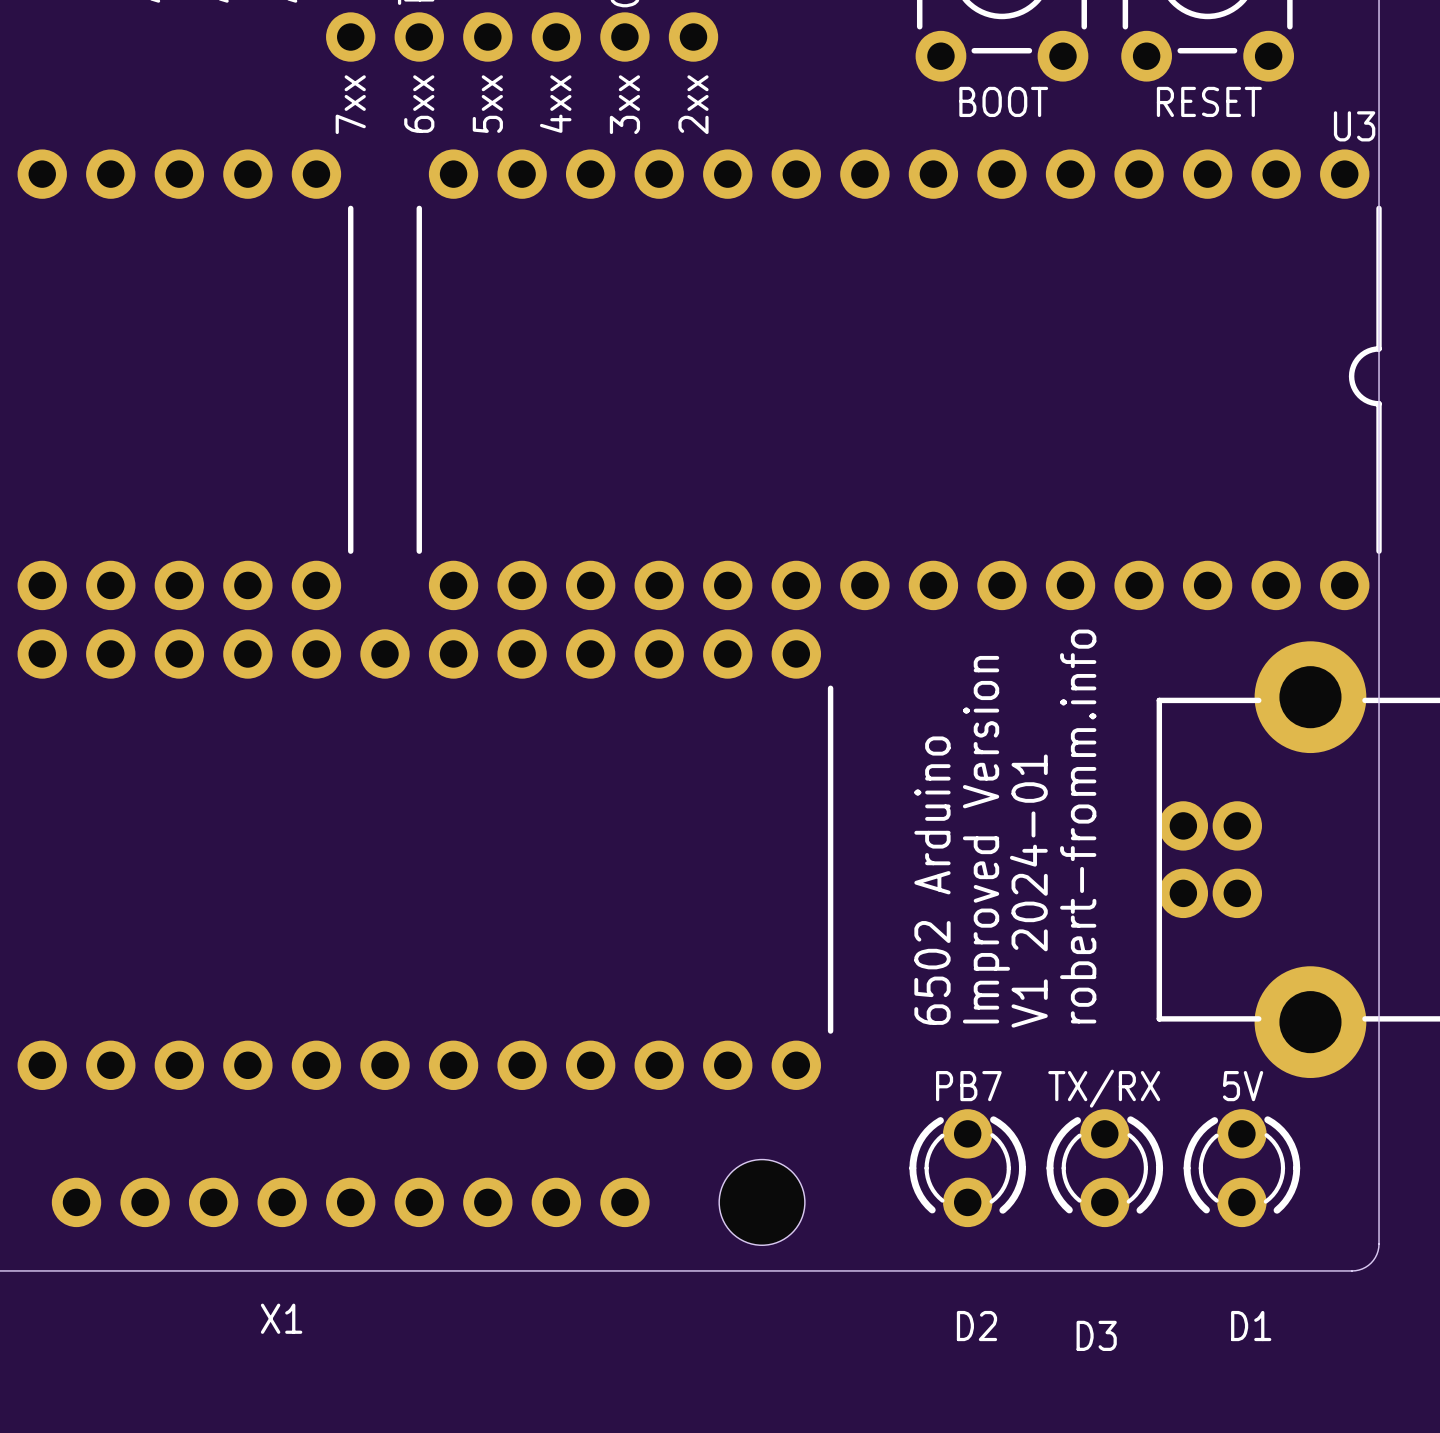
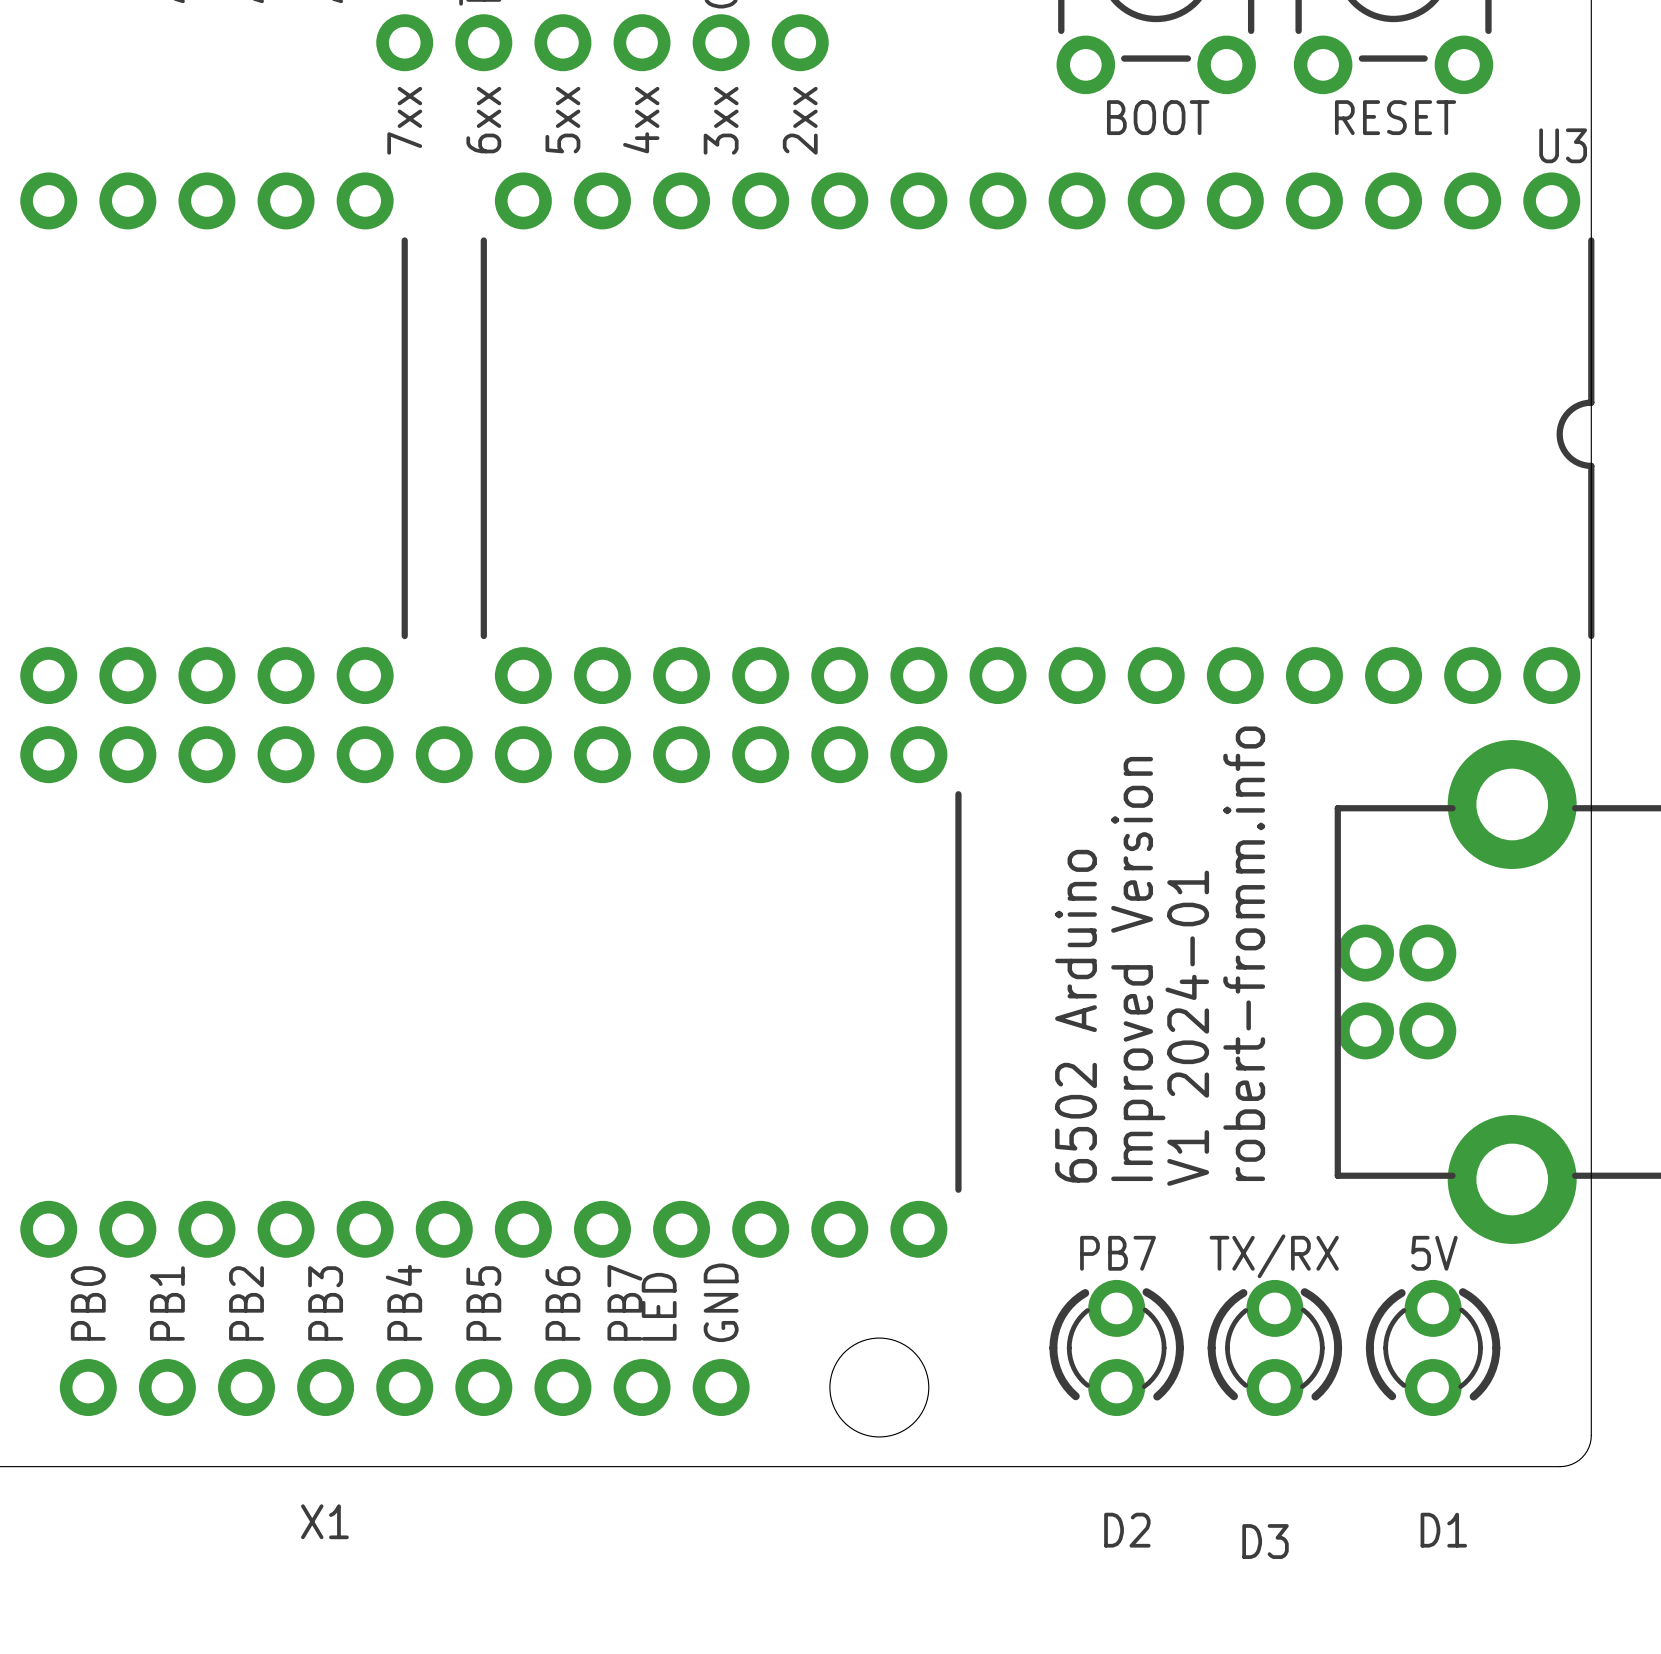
text: none -> PB4 (403, 1302)
text: none -> PB7 (624, 1302)
text: none -> GND (721, 1302)
text: none -> PB0 (88, 1303)
text: none -> PB1 (167, 1303)
text: none -> PB2 (246, 1303)
text: none -> PB3 (325, 1303)
text: none -> PB5 (483, 1303)
text: none -> PB6 (562, 1303)
text: none -> LED (659, 1306)

